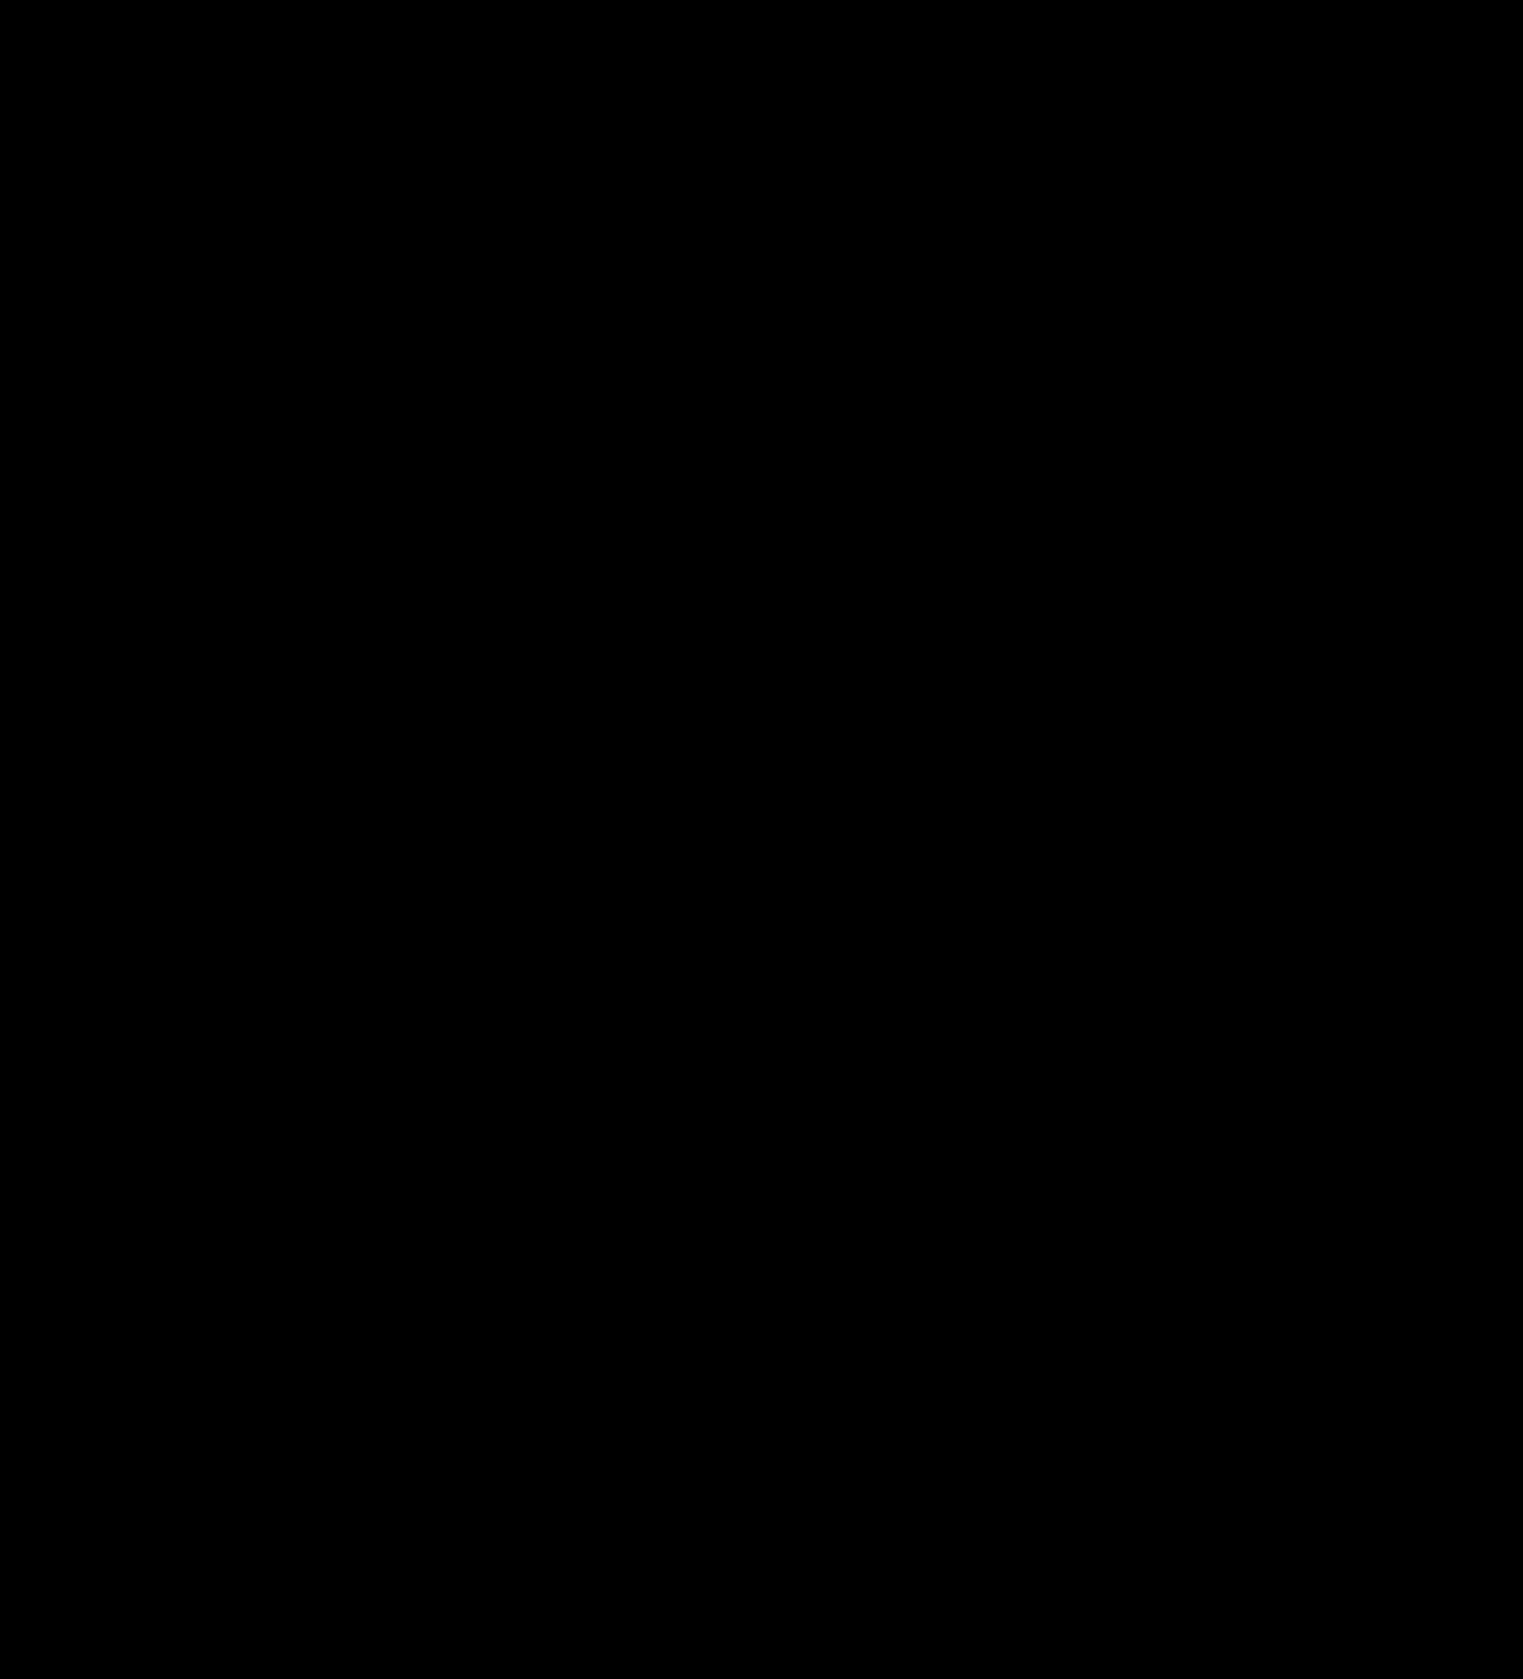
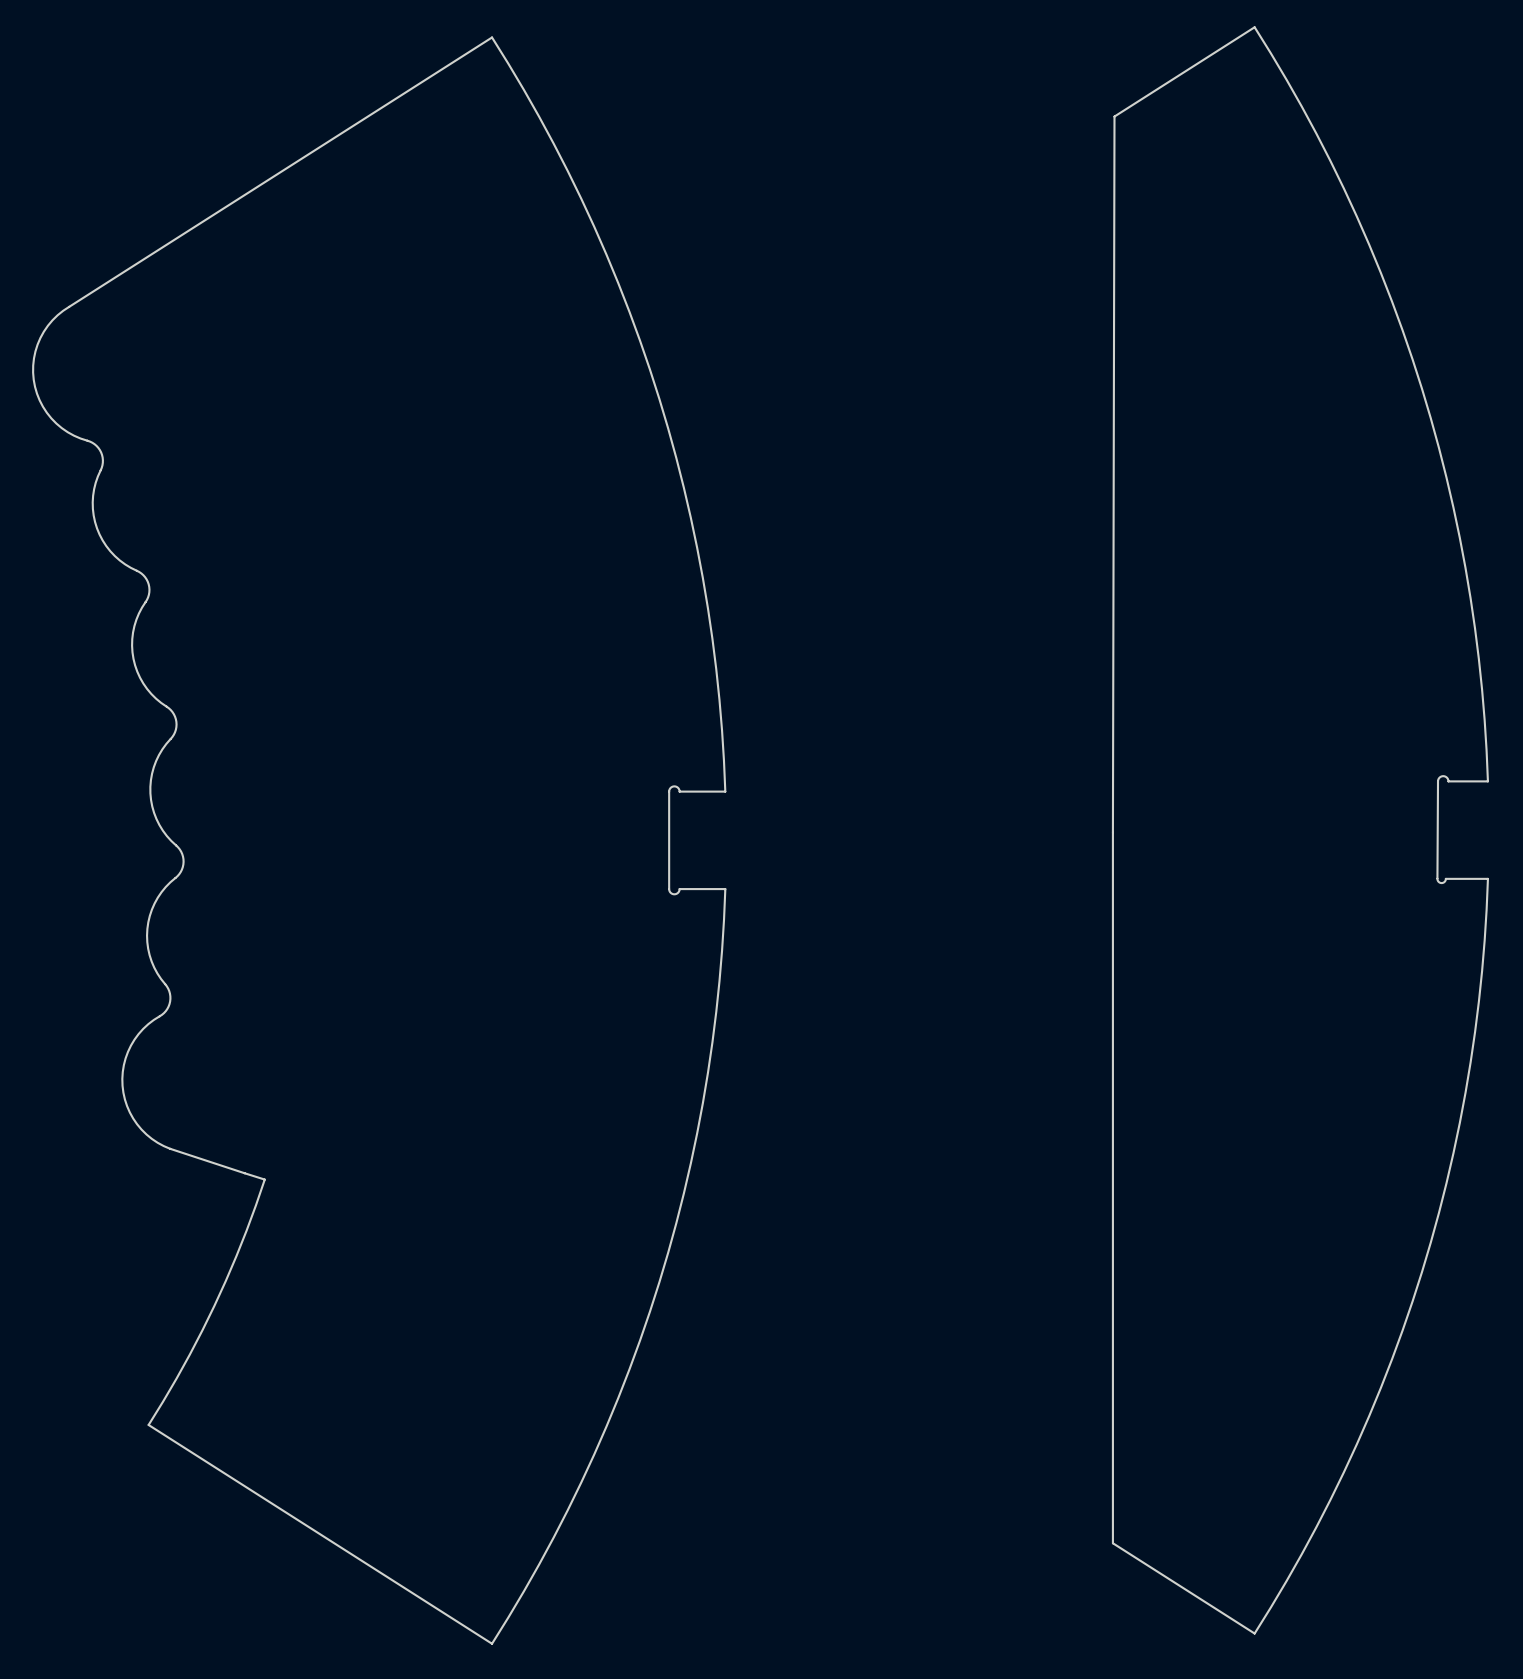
board edge: none -> (492, 37) (63, 310) (47, 325) (40, 337) (35, 351) (33, 372) (37, 393) (51, 418) (67, 432) (94, 444) (101, 452) (102, 465) (93, 495) (95, 522) (99, 534) (110, 551) (125, 564) (141, 573) (147, 581) (148, 594) (138, 613) (133, 632) (133, 658) (143, 683) (156, 698) (170, 710) (176, 721) (173, 734) (156, 760) (150, 786) (151, 800) (156, 819) (166, 836) (179, 849) (183, 859) (180, 872) (165, 887) (154, 903) (147, 928) (149, 955) (157, 973) (168, 988) (170, 1001) (164, 1013) (138, 1034) (127, 1051) (122, 1078) (124, 1099) (137, 1124) (157, 1142) (170, 1148) (264, 1179) (246, 1230) (214, 1305) (189, 1354) (148, 1424) (492, 1643) (539, 1564) (581, 1482) (629, 1369) (659, 1282) (690, 1163) (708, 1072) (719, 981) (725, 889) (679, 889) (678, 892) (674, 894) (669, 889) (669, 788) (674, 786) (678, 787) (679, 791) (725, 791) (719, 699) (707, 608) (697, 547) (676, 457) (639, 340) (606, 254) (553, 143) (492, 37)
board edge: none -> (1438, 781) (1439, 777) (1443, 776) (1446, 777) (1448, 781) (1487, 781) (1482, 689) (1475, 628) (1459, 537) (1446, 477) (1412, 359) (1369, 244) (1316, 133) (1254, 27) (1114, 116) (1112, 832) (1112, 1543) (1254, 1633) (1316, 1527) (1369, 1416) (1412, 1301) (1446, 1182) (1459, 1122) (1475, 1031) (1482, 970) (1487, 878) (1445, 878) (1441, 883) (1437, 878)
board edge: none -> (1438, 781) (1437, 878)

